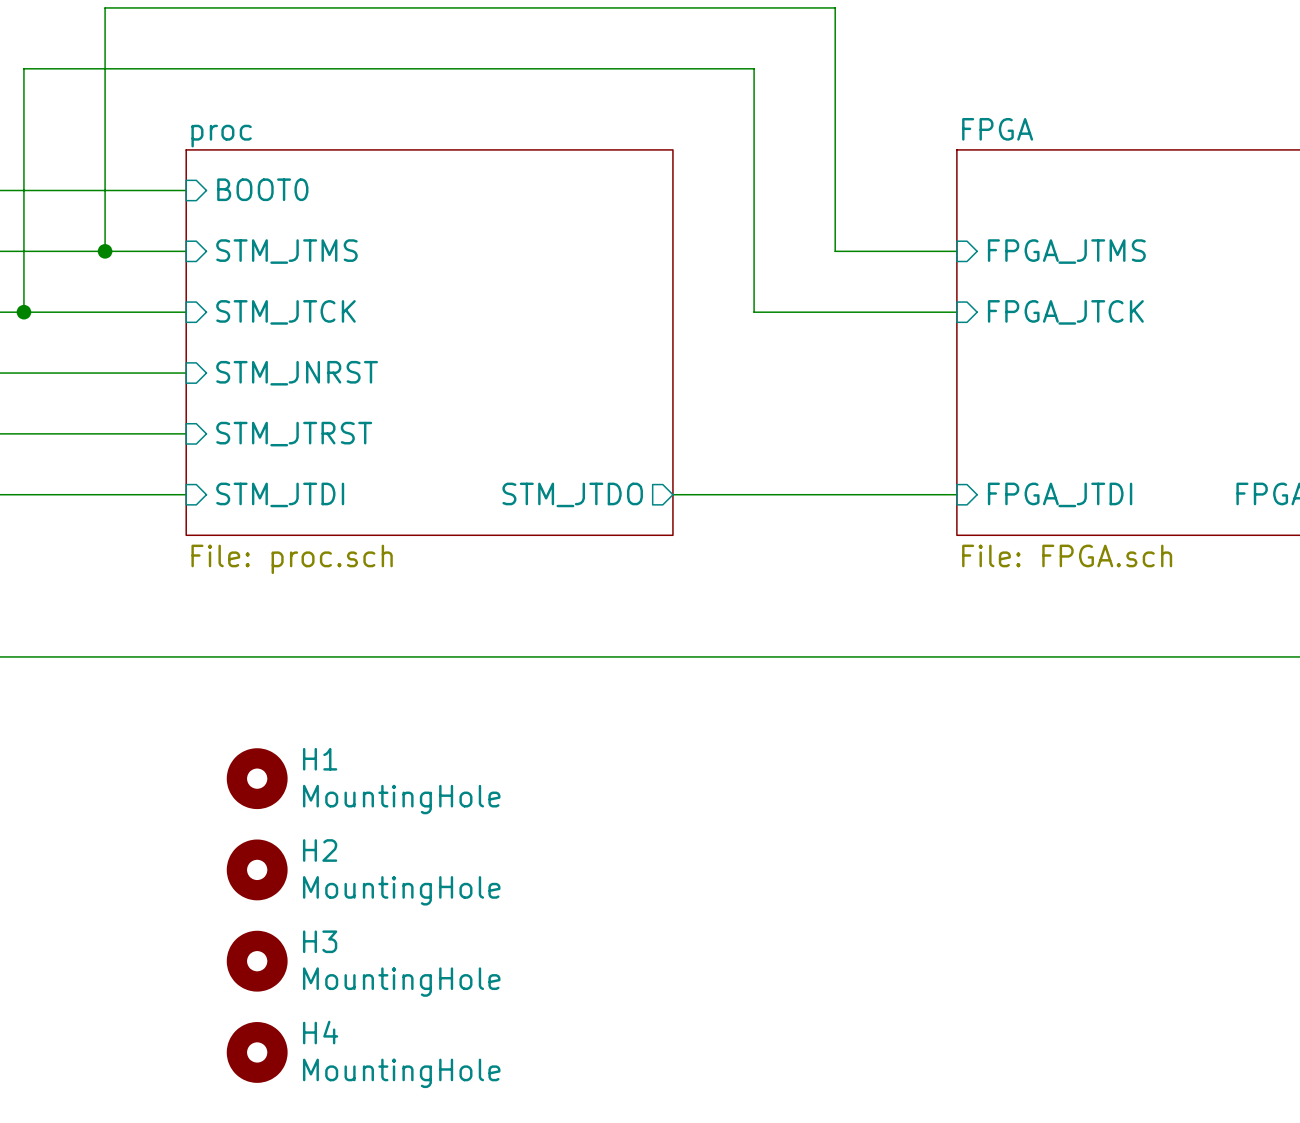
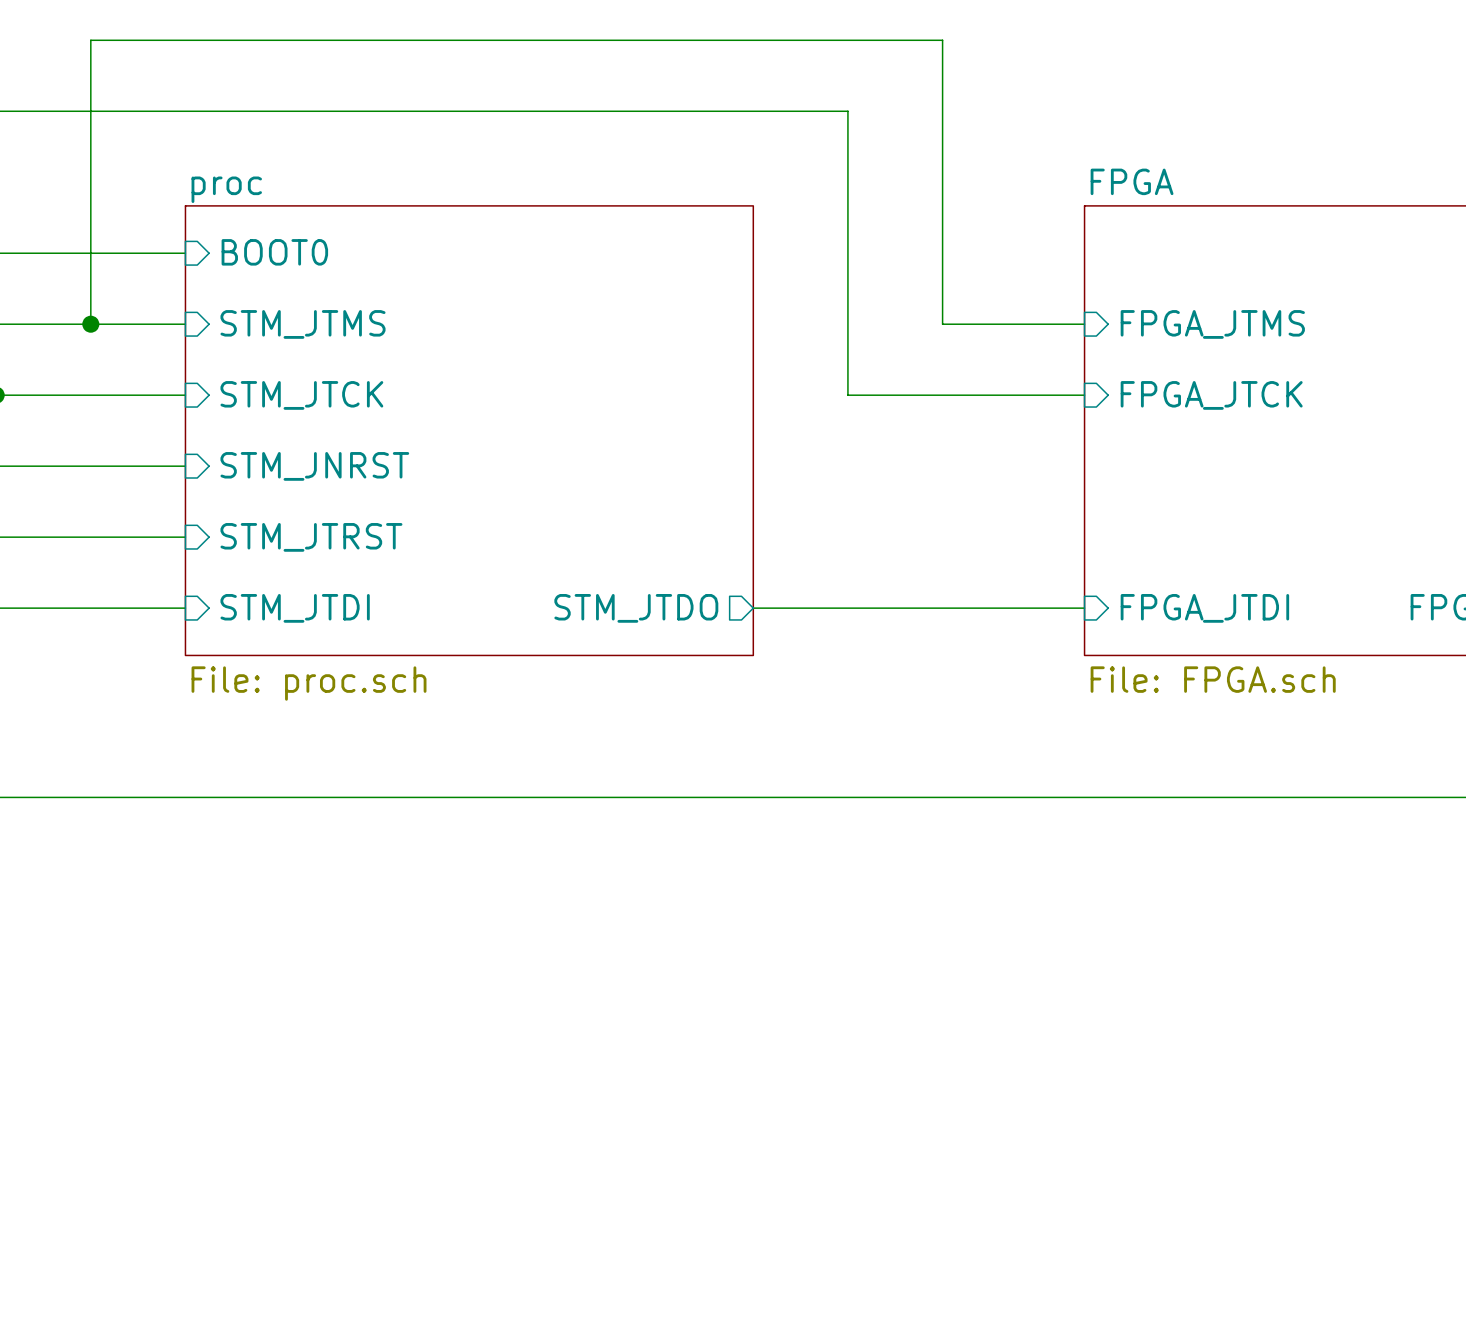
H1: MountingHole (257, 778) -> none
H2: MountingHole (257, 869) -> none
H3: MountingHole (257, 961) -> none
H4: MountingHole (257, 1052) -> none

